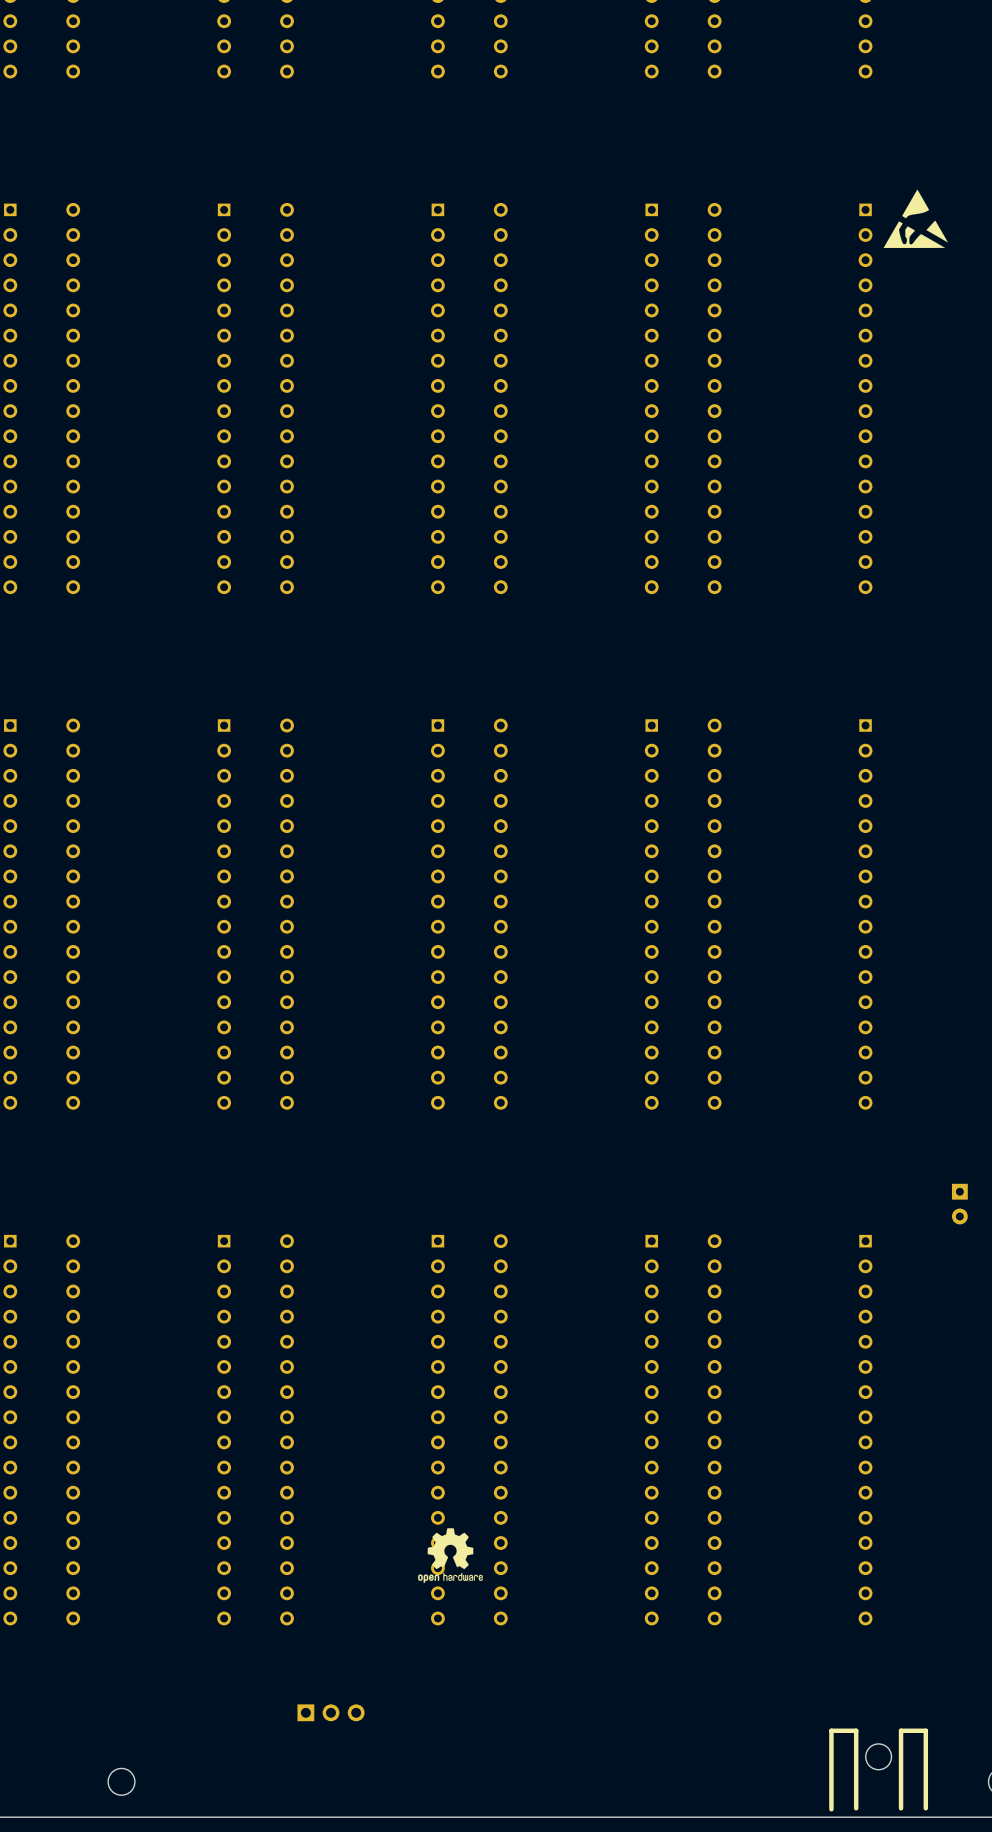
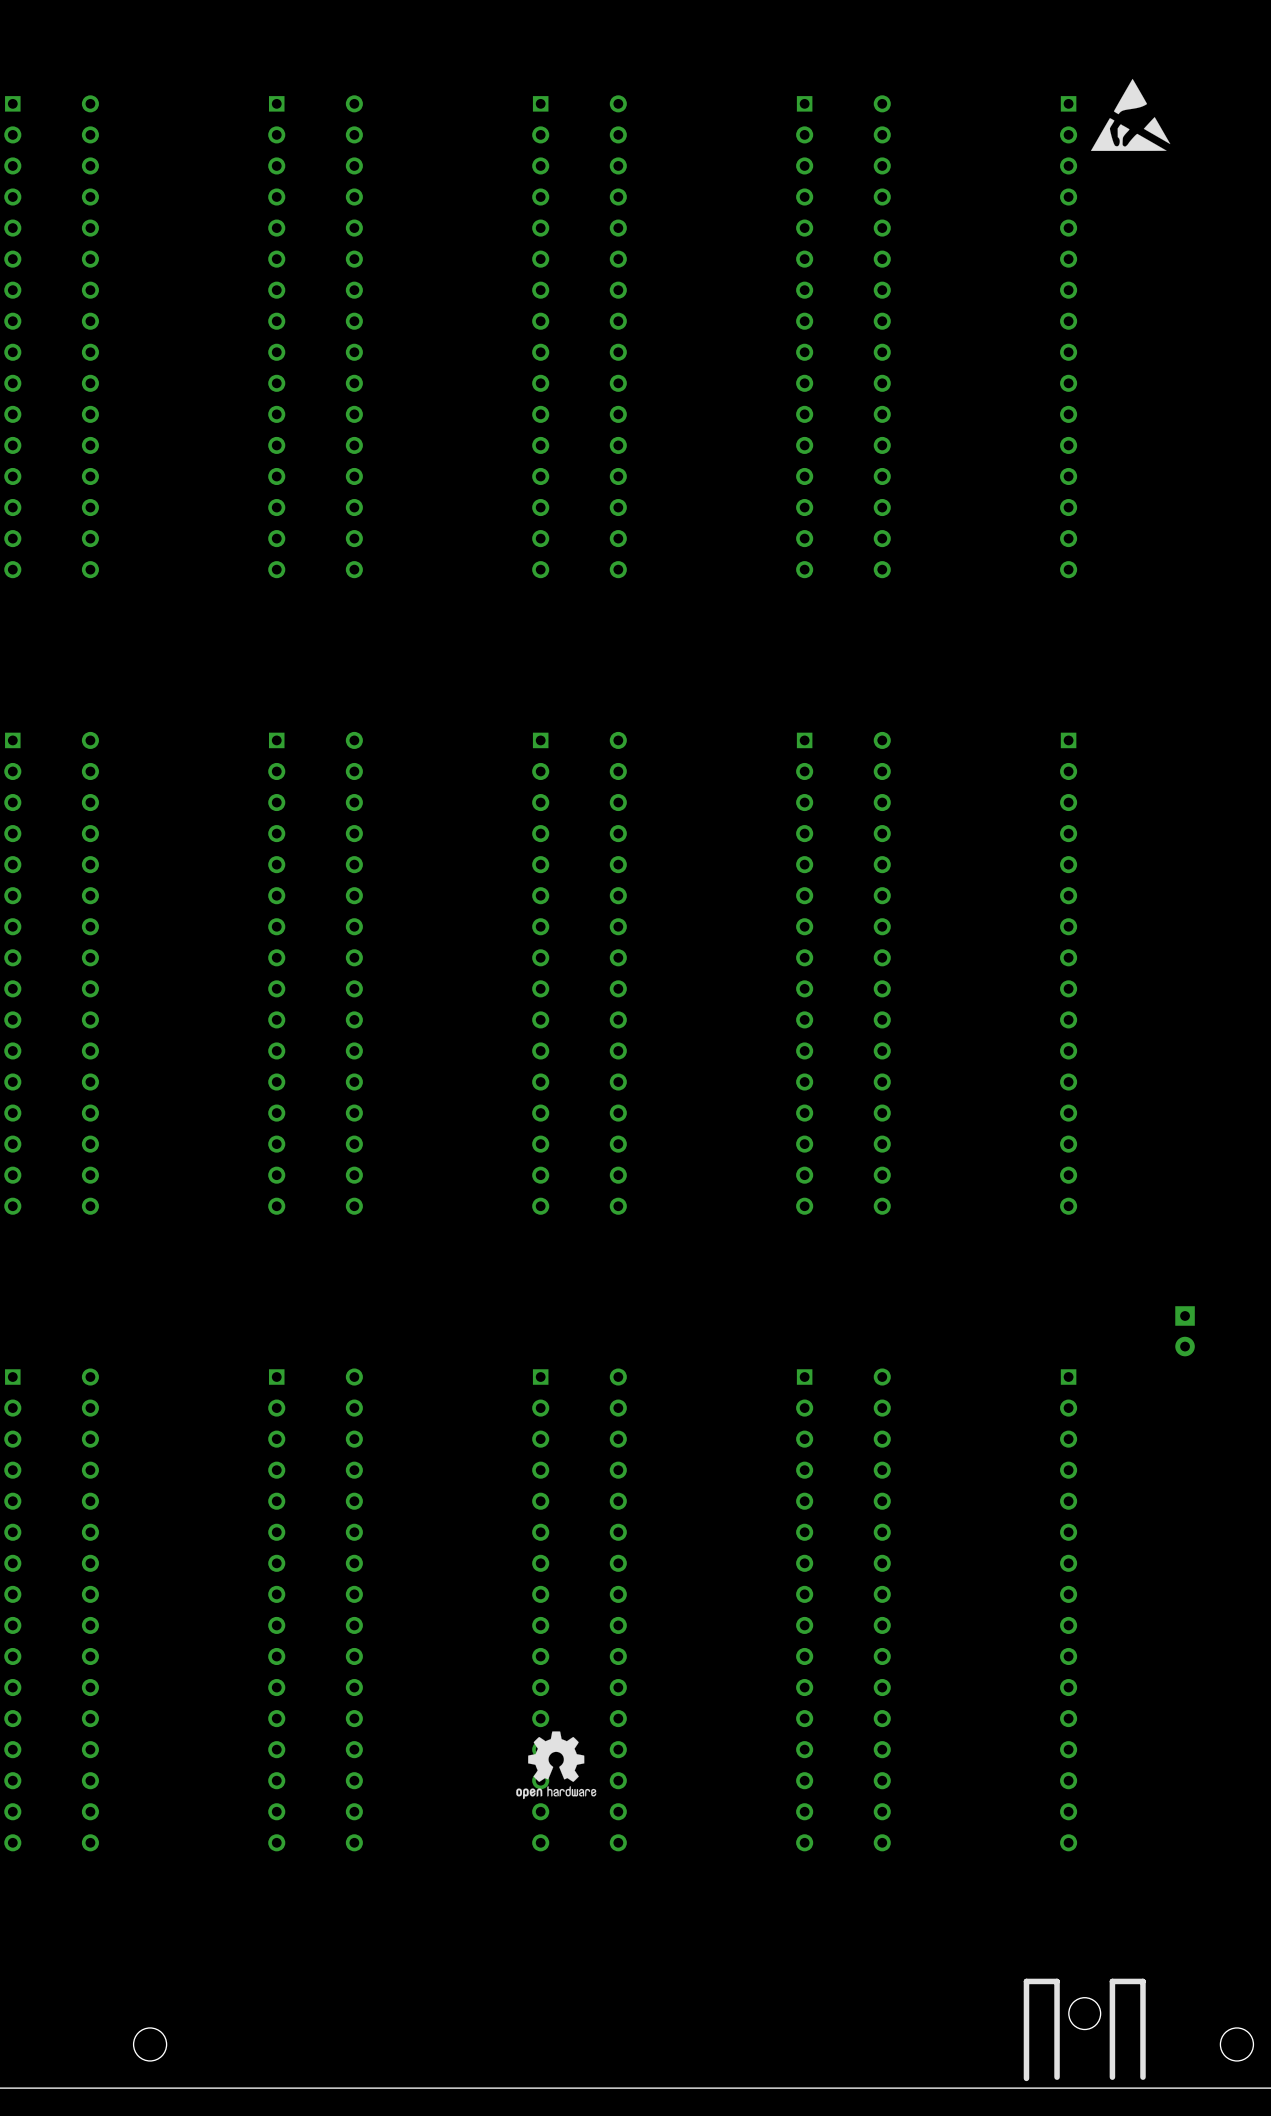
part: (331, 1712) -> none

